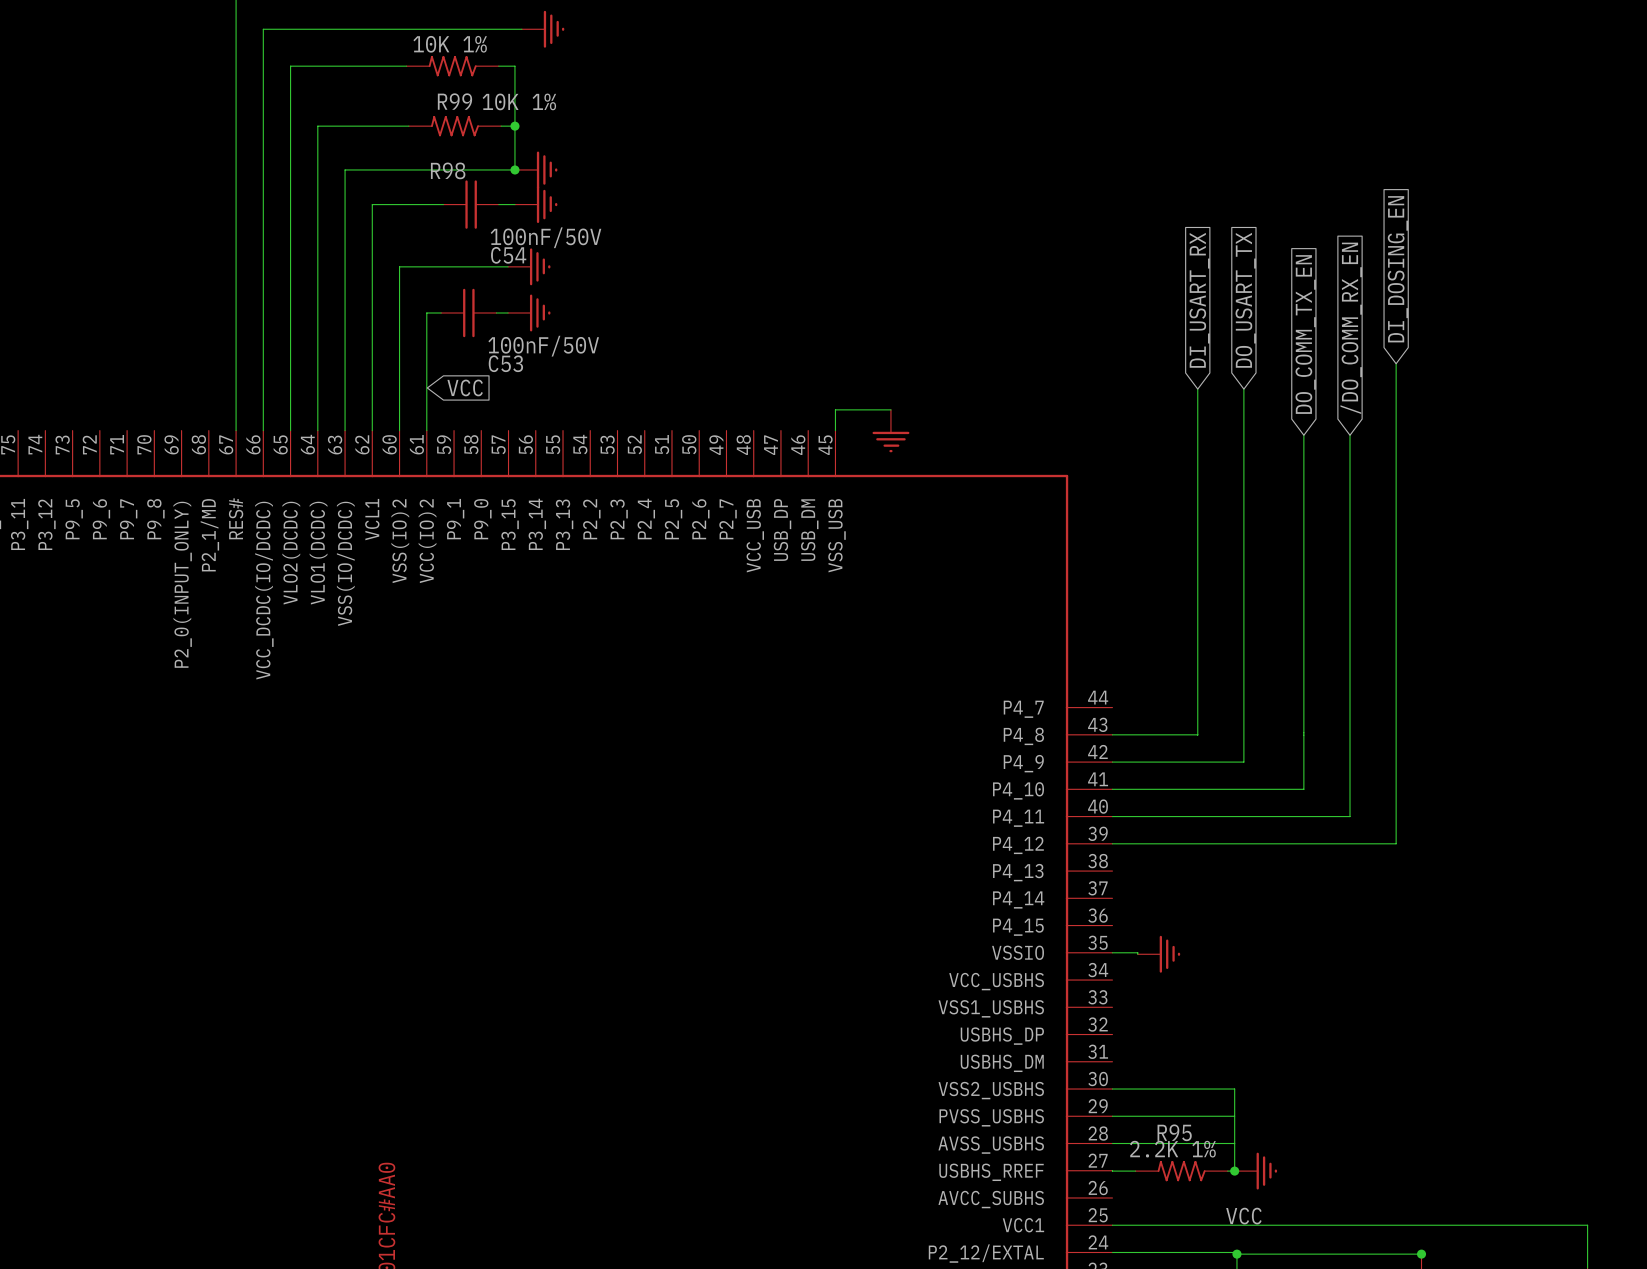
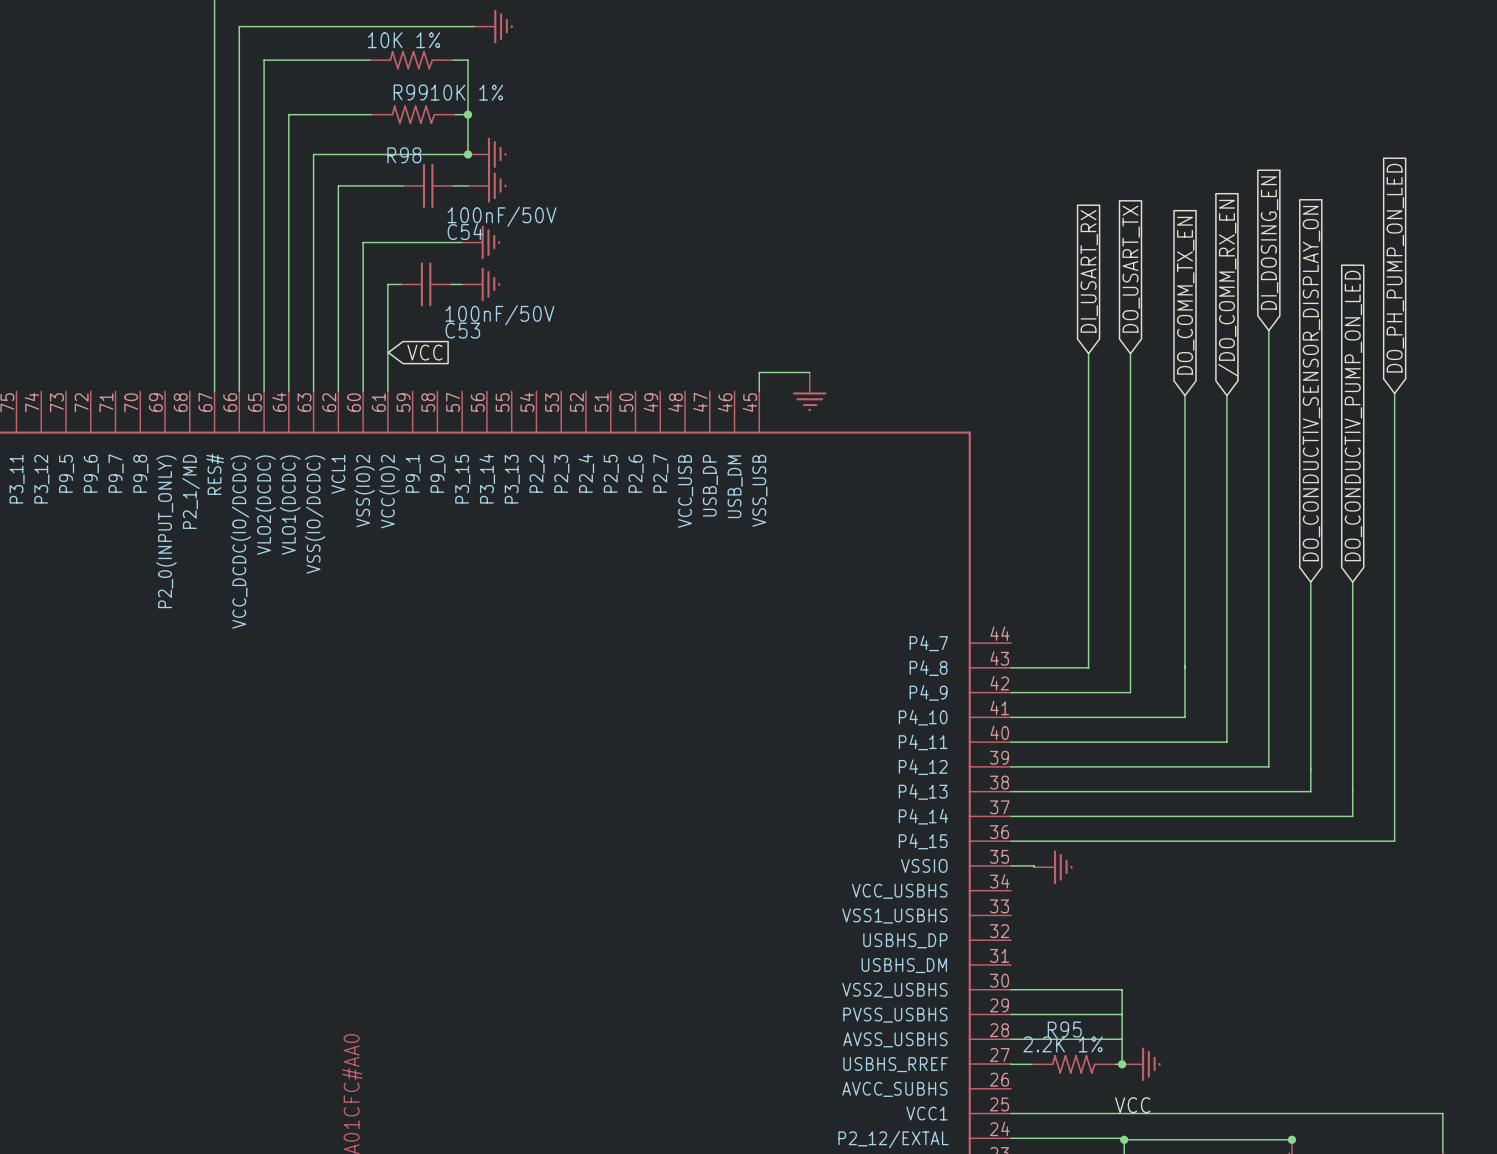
global label: none -> DO_PH_PUMP_ON_LED (1395, 268)
wire: none -> (1394, 393) (1394, 841) (1011, 841)
global label: none -> DO_CONDUCTIV_SENSOR_DISPLAY_ON (1311, 383)
global label: none -> DO_CONDUCTIV_PUMP_ON_LED (1353, 415)
wire: none -> (1310, 582) (1310, 791) (1011, 791)
wire: none -> (1352, 582) (1352, 816) (1011, 816)

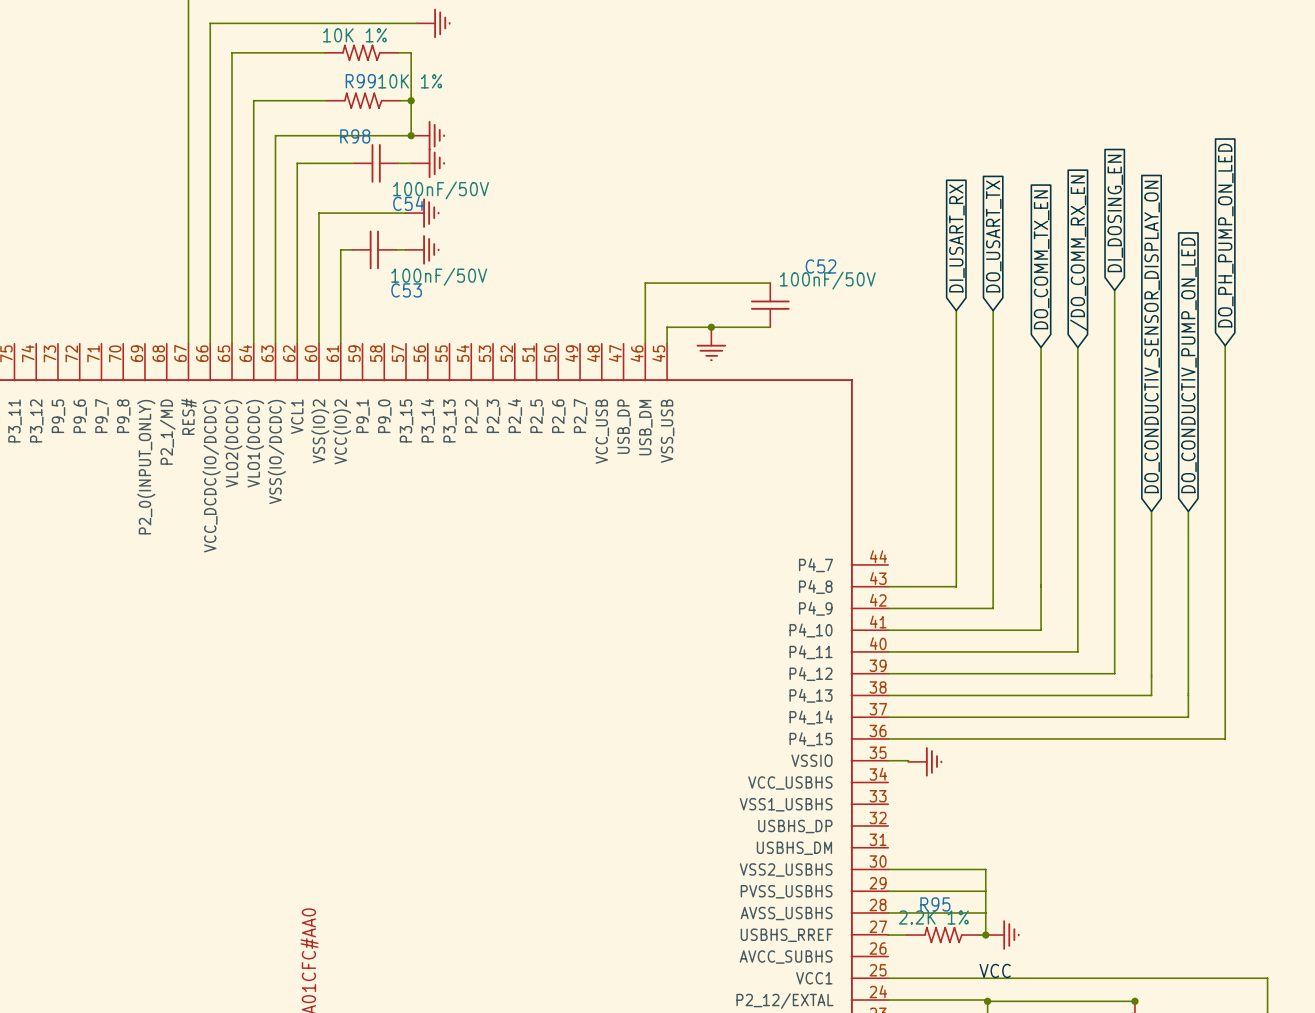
wire: none -> (770, 283) (645, 283) (645, 343)
C52: none -> 100nF/50V (770, 305)
global label: VCC (424, 352) -> none
wire: none -> (711, 327) (770, 327)
junction: none -> (711, 327)

